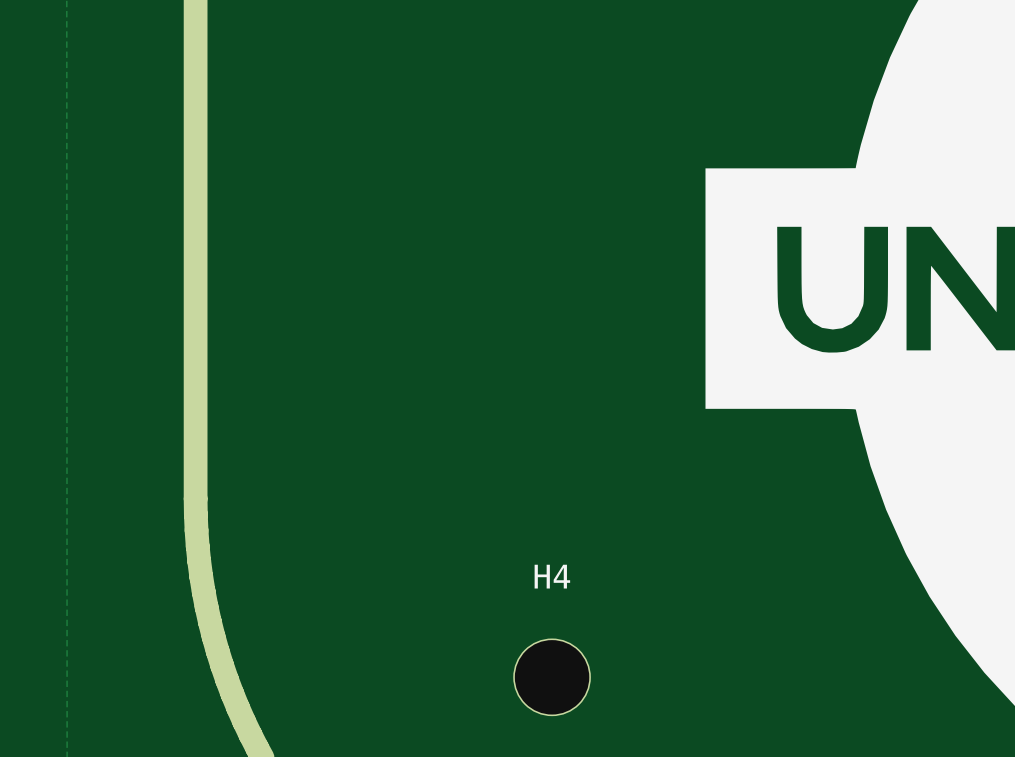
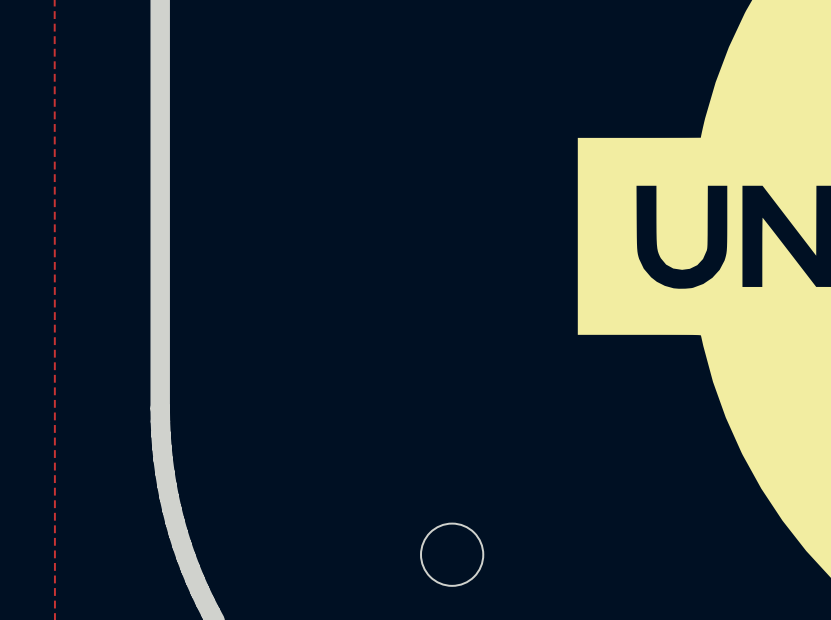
H4 name: H4 (552, 576) -> none

